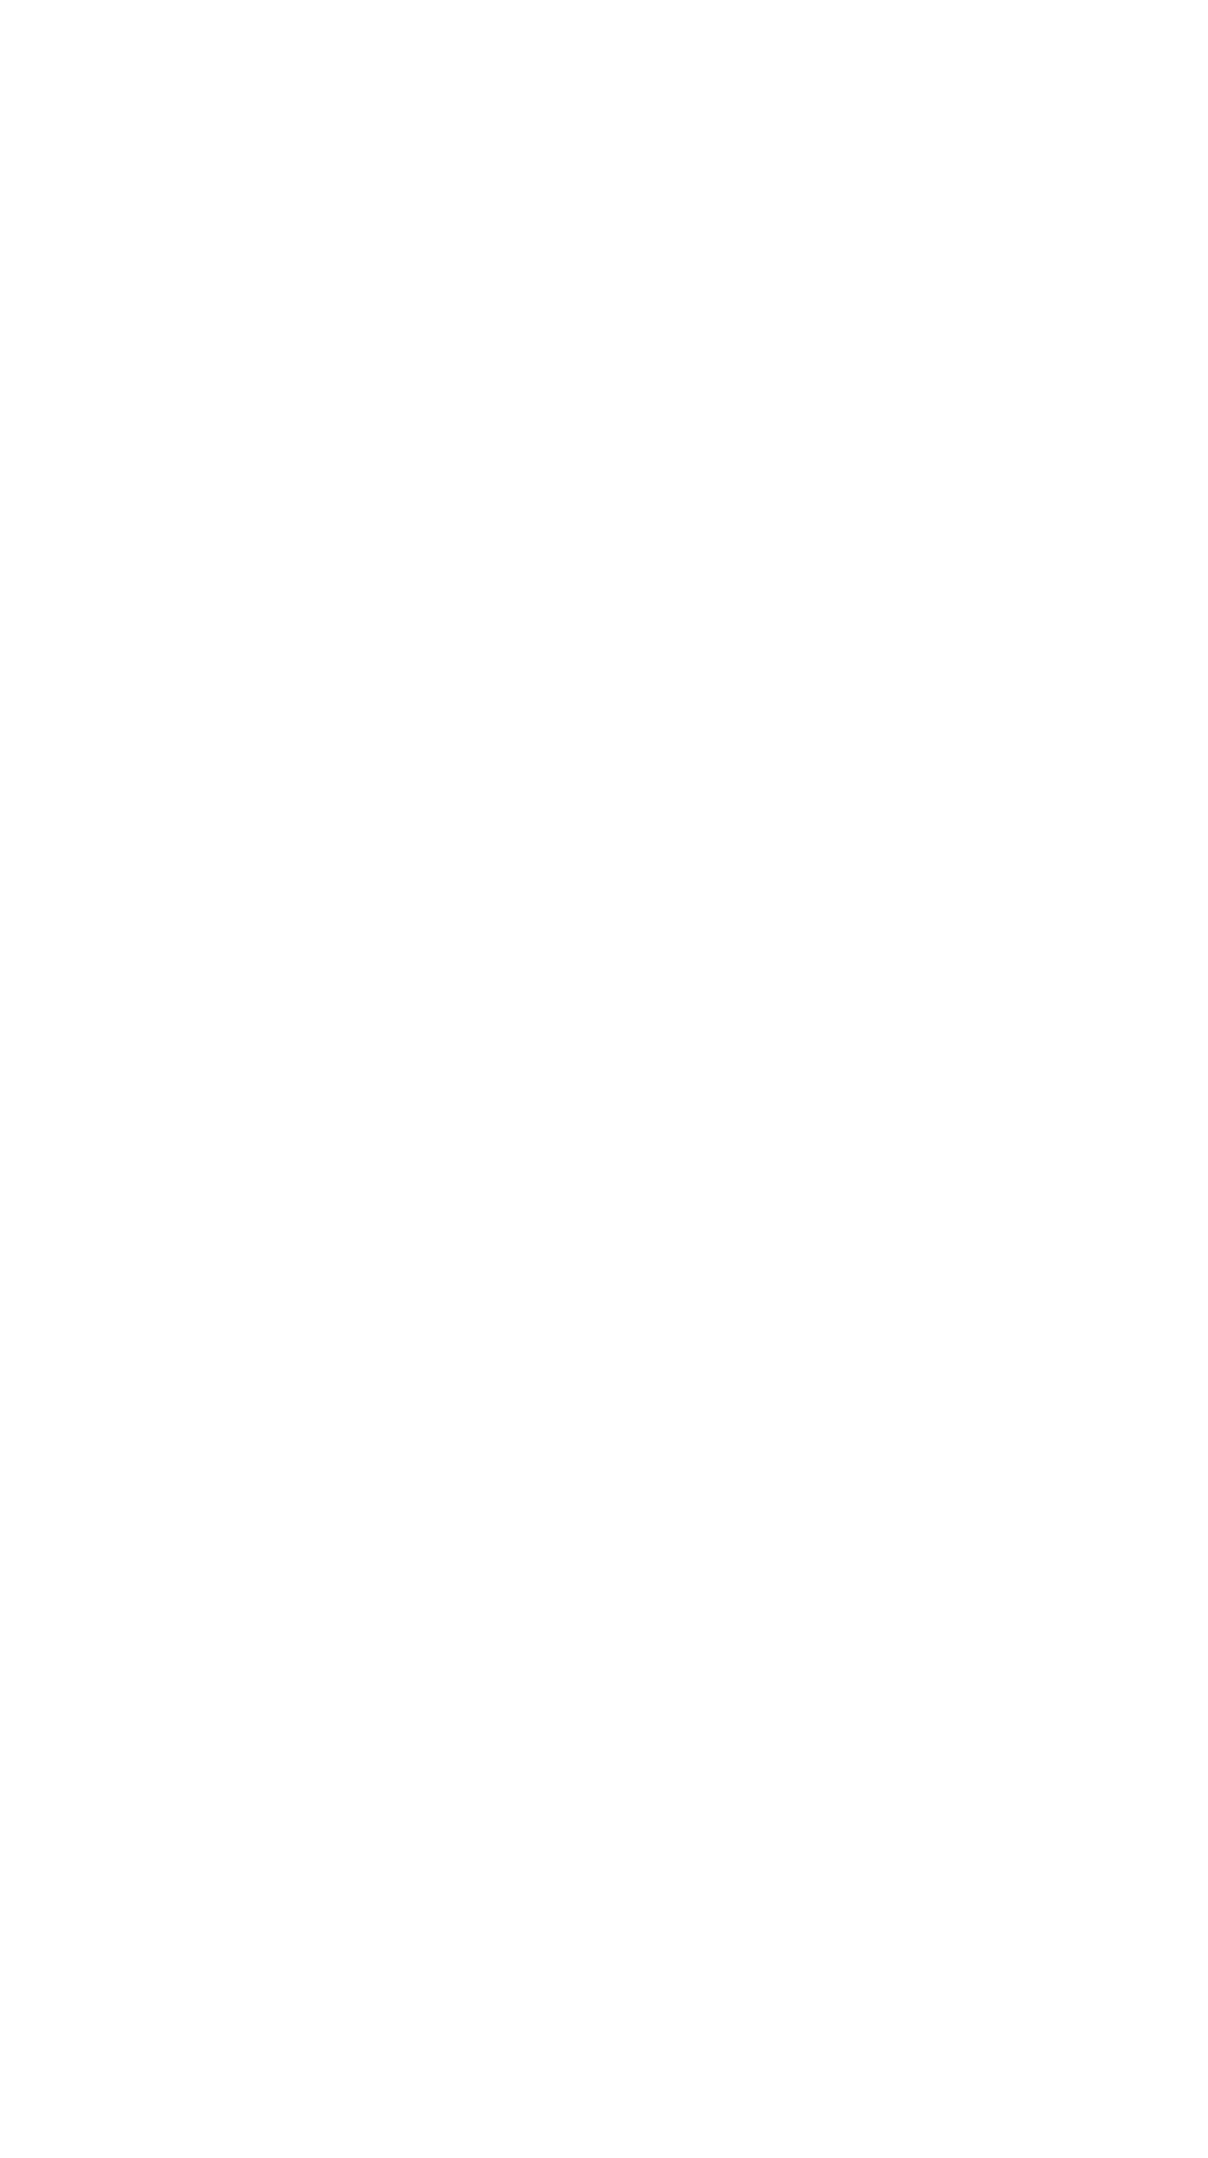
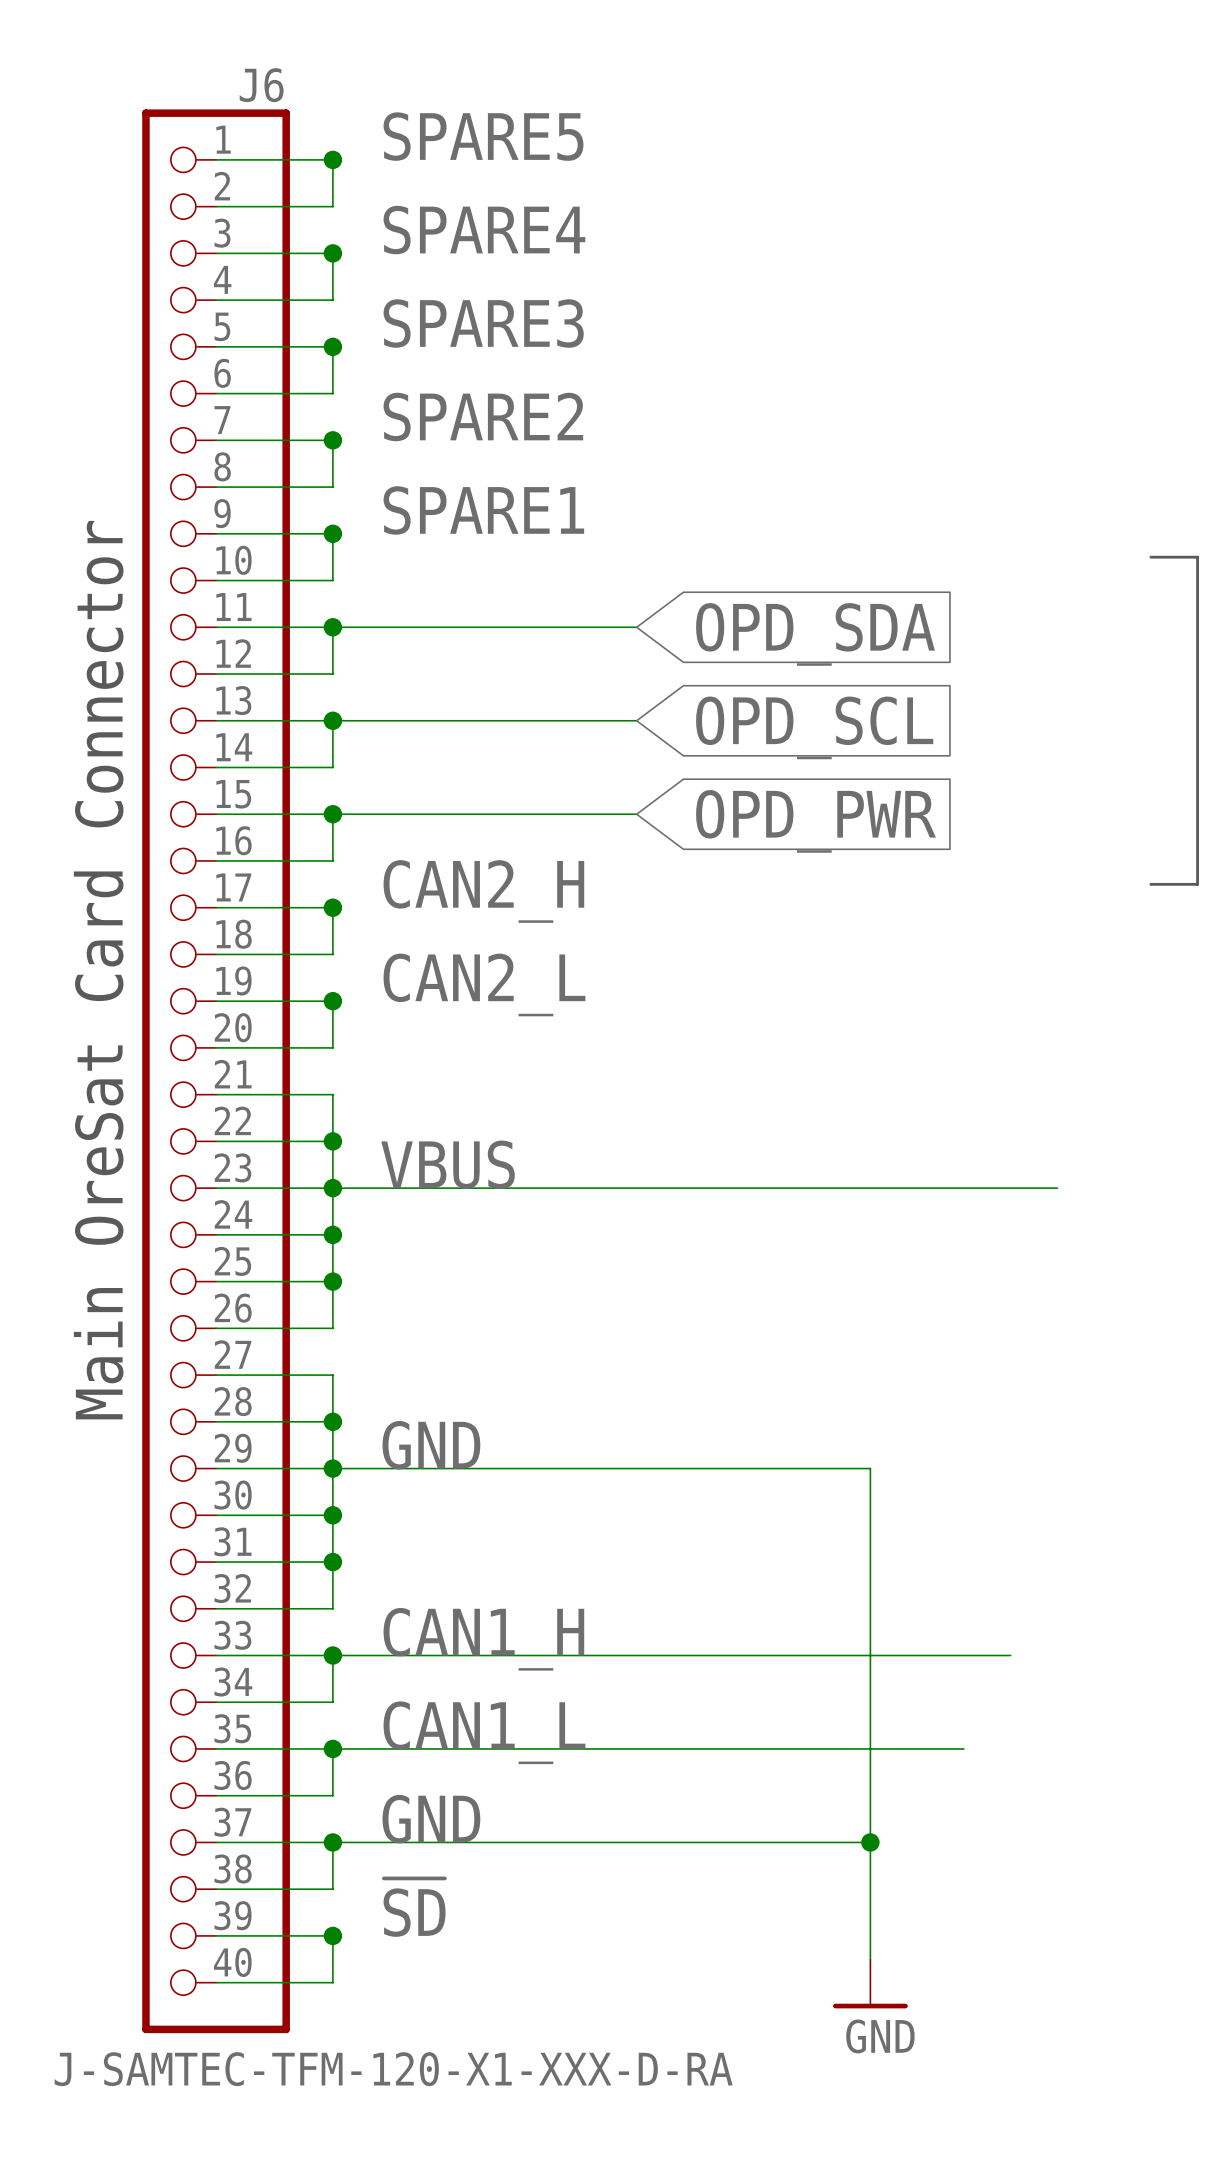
label: none -> SPARE5 (483, 136)
wire: none -> (216, 159) (332, 159) (332, 206) (216, 206)
junction: none -> (332, 159)
label: none -> SPARE4 (484, 230)
wire: none -> (216, 253) (332, 253) (332, 300) (216, 300)
junction: none -> (332, 253)
label: none -> SPARE3 (483, 323)
wire: none -> (216, 346) (332, 346) (332, 393) (216, 393)
junction: none -> (332, 346)
label: none -> SPARE2 (483, 417)
wire: none -> (216, 440) (332, 440) (332, 487) (216, 487)
junction: none -> (332, 440)
label: none -> SPARE1 (483, 510)
wire: none -> (216, 533) (332, 533) (332, 580) (216, 580)
junction: none -> (332, 533)
line: none -> (1150, 557) (1197, 557) (1197, 884) (1150, 884)
wire: none -> (216, 627) (636, 627)
wire: none -> (332, 627) (332, 674) (216, 674)
junction: none -> (332, 627)
global label: none -> OPD_SDA (815, 634)
wire: none -> (216, 720) (636, 720)
wire: none -> (332, 720) (332, 767) (216, 767)
junction: none -> (332, 720)
global label: none -> OPD_SCL (814, 727)
wire: none -> (216, 814) (636, 814)
wire: none -> (332, 814) (332, 860) (216, 860)
junction: none -> (332, 814)
global label: none -> OPD_PWR (816, 821)
label: none -> CAN2_H (483, 891)
wire: none -> (216, 907) (332, 907) (332, 954) (216, 954)
junction: none -> (332, 907)
text: none -> Main OreSat Card Connector (98, 970)
label: none -> CAN2_L (484, 984)
wire: none -> (216, 1001) (332, 1001) (332, 1047) (216, 1047)
junction: none -> (332, 1001)
J6: none -> J-SAMTEC-TFM-120-X1-XXX-D-RA (216, 1071)
wire: none -> (216, 1094) (332, 1094) (332, 1328) (216, 1328)
wire: none -> (216, 1141) (332, 1141)
junction: none -> (332, 1141)
label: none -> VBUS (448, 1164)
wire: none -> (216, 1188) (1057, 1188)
junction: none -> (332, 1188)
wire: none -> (216, 1234) (332, 1234)
junction: none -> (332, 1234)
wire: none -> (216, 1281) (332, 1281)
junction: none -> (332, 1281)
wire: none -> (216, 1375) (332, 1375) (332, 1608) (216, 1608)
wire: none -> (216, 1421) (332, 1421)
junction: none -> (332, 1421)
label: none -> GND (431, 1445)
wire: none -> (216, 1468) (870, 1468) (870, 1959)
junction: none -> (332, 1468)
wire: none -> (216, 1515) (332, 1515)
junction: none -> (332, 1515)
wire: none -> (216, 1562) (332, 1562)
junction: none -> (332, 1562)
label: none -> CAN1_H (483, 1639)
wire: none -> (216, 1655) (1010, 1655)
wire: none -> (332, 1655) (332, 1702) (216, 1702)
junction: none -> (332, 1655)
label: none -> CAN1_L (484, 1732)
wire: none -> (216, 1748) (963, 1748)
wire: none -> (332, 1748) (332, 1795) (216, 1795)
junction: none -> (332, 1748)
label: none -> GND (431, 1819)
wire: none -> (216, 1842) (870, 1842)
wire: none -> (332, 1842) (332, 1889) (216, 1889)
junction: none -> (332, 1842)
junction: none -> (870, 1842)
label: none -> ~{SD} (414, 1907)
wire: none -> (216, 1935) (332, 1935) (332, 1982) (216, 1982)
junction: none -> (332, 1935)
power symbol: none -> GND (870, 1983)

